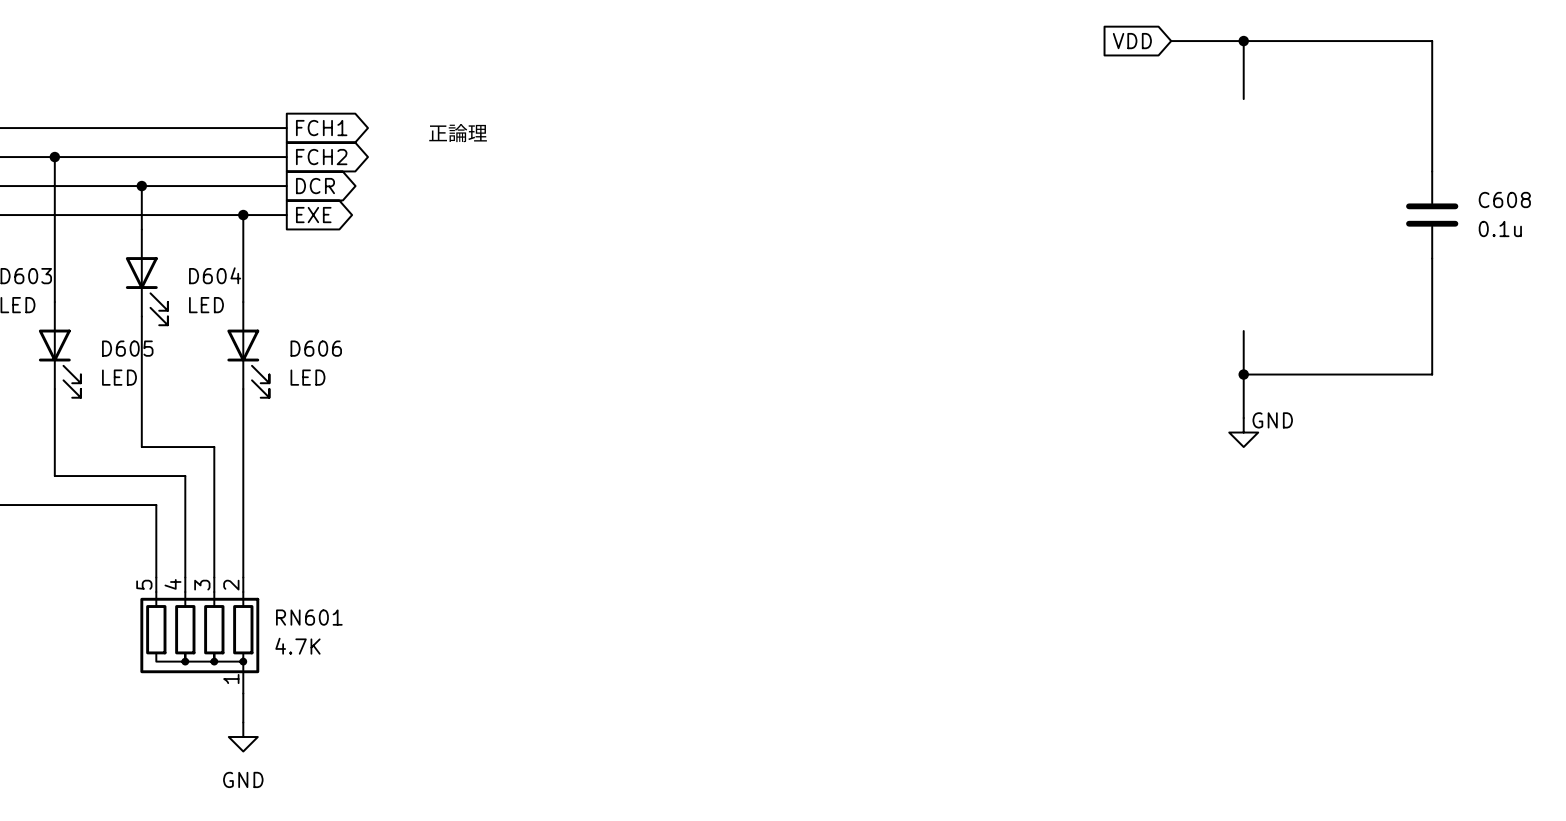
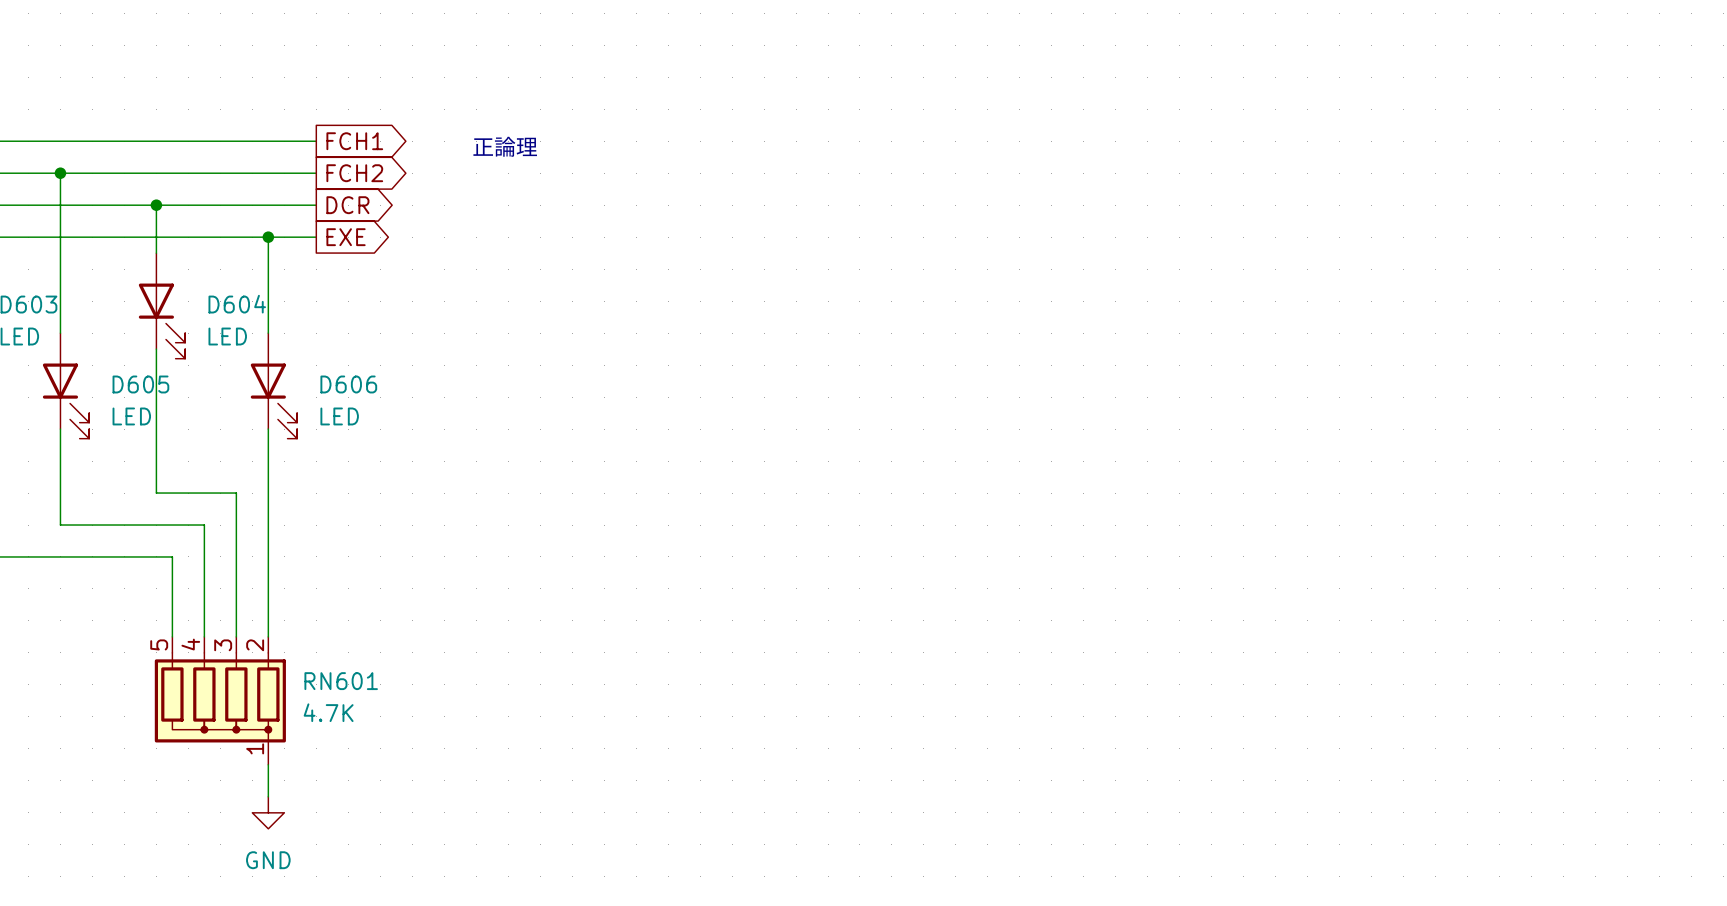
global label: VDD (1132, 41) -> none
wire: (1171, 41) (1432, 41) (1432, 171) -> none
wire: (1243, 41) (1243, 99) -> none
junction: (1243, 41) -> none
C608: 0.1u (1432, 215) -> none
wire: (1432, 258) (1432, 374) (1243, 374) -> none
wire: (1243, 331) (1243, 418) -> none
junction: (1243, 374) -> none
power symbol: GND (1243, 432) -> none

